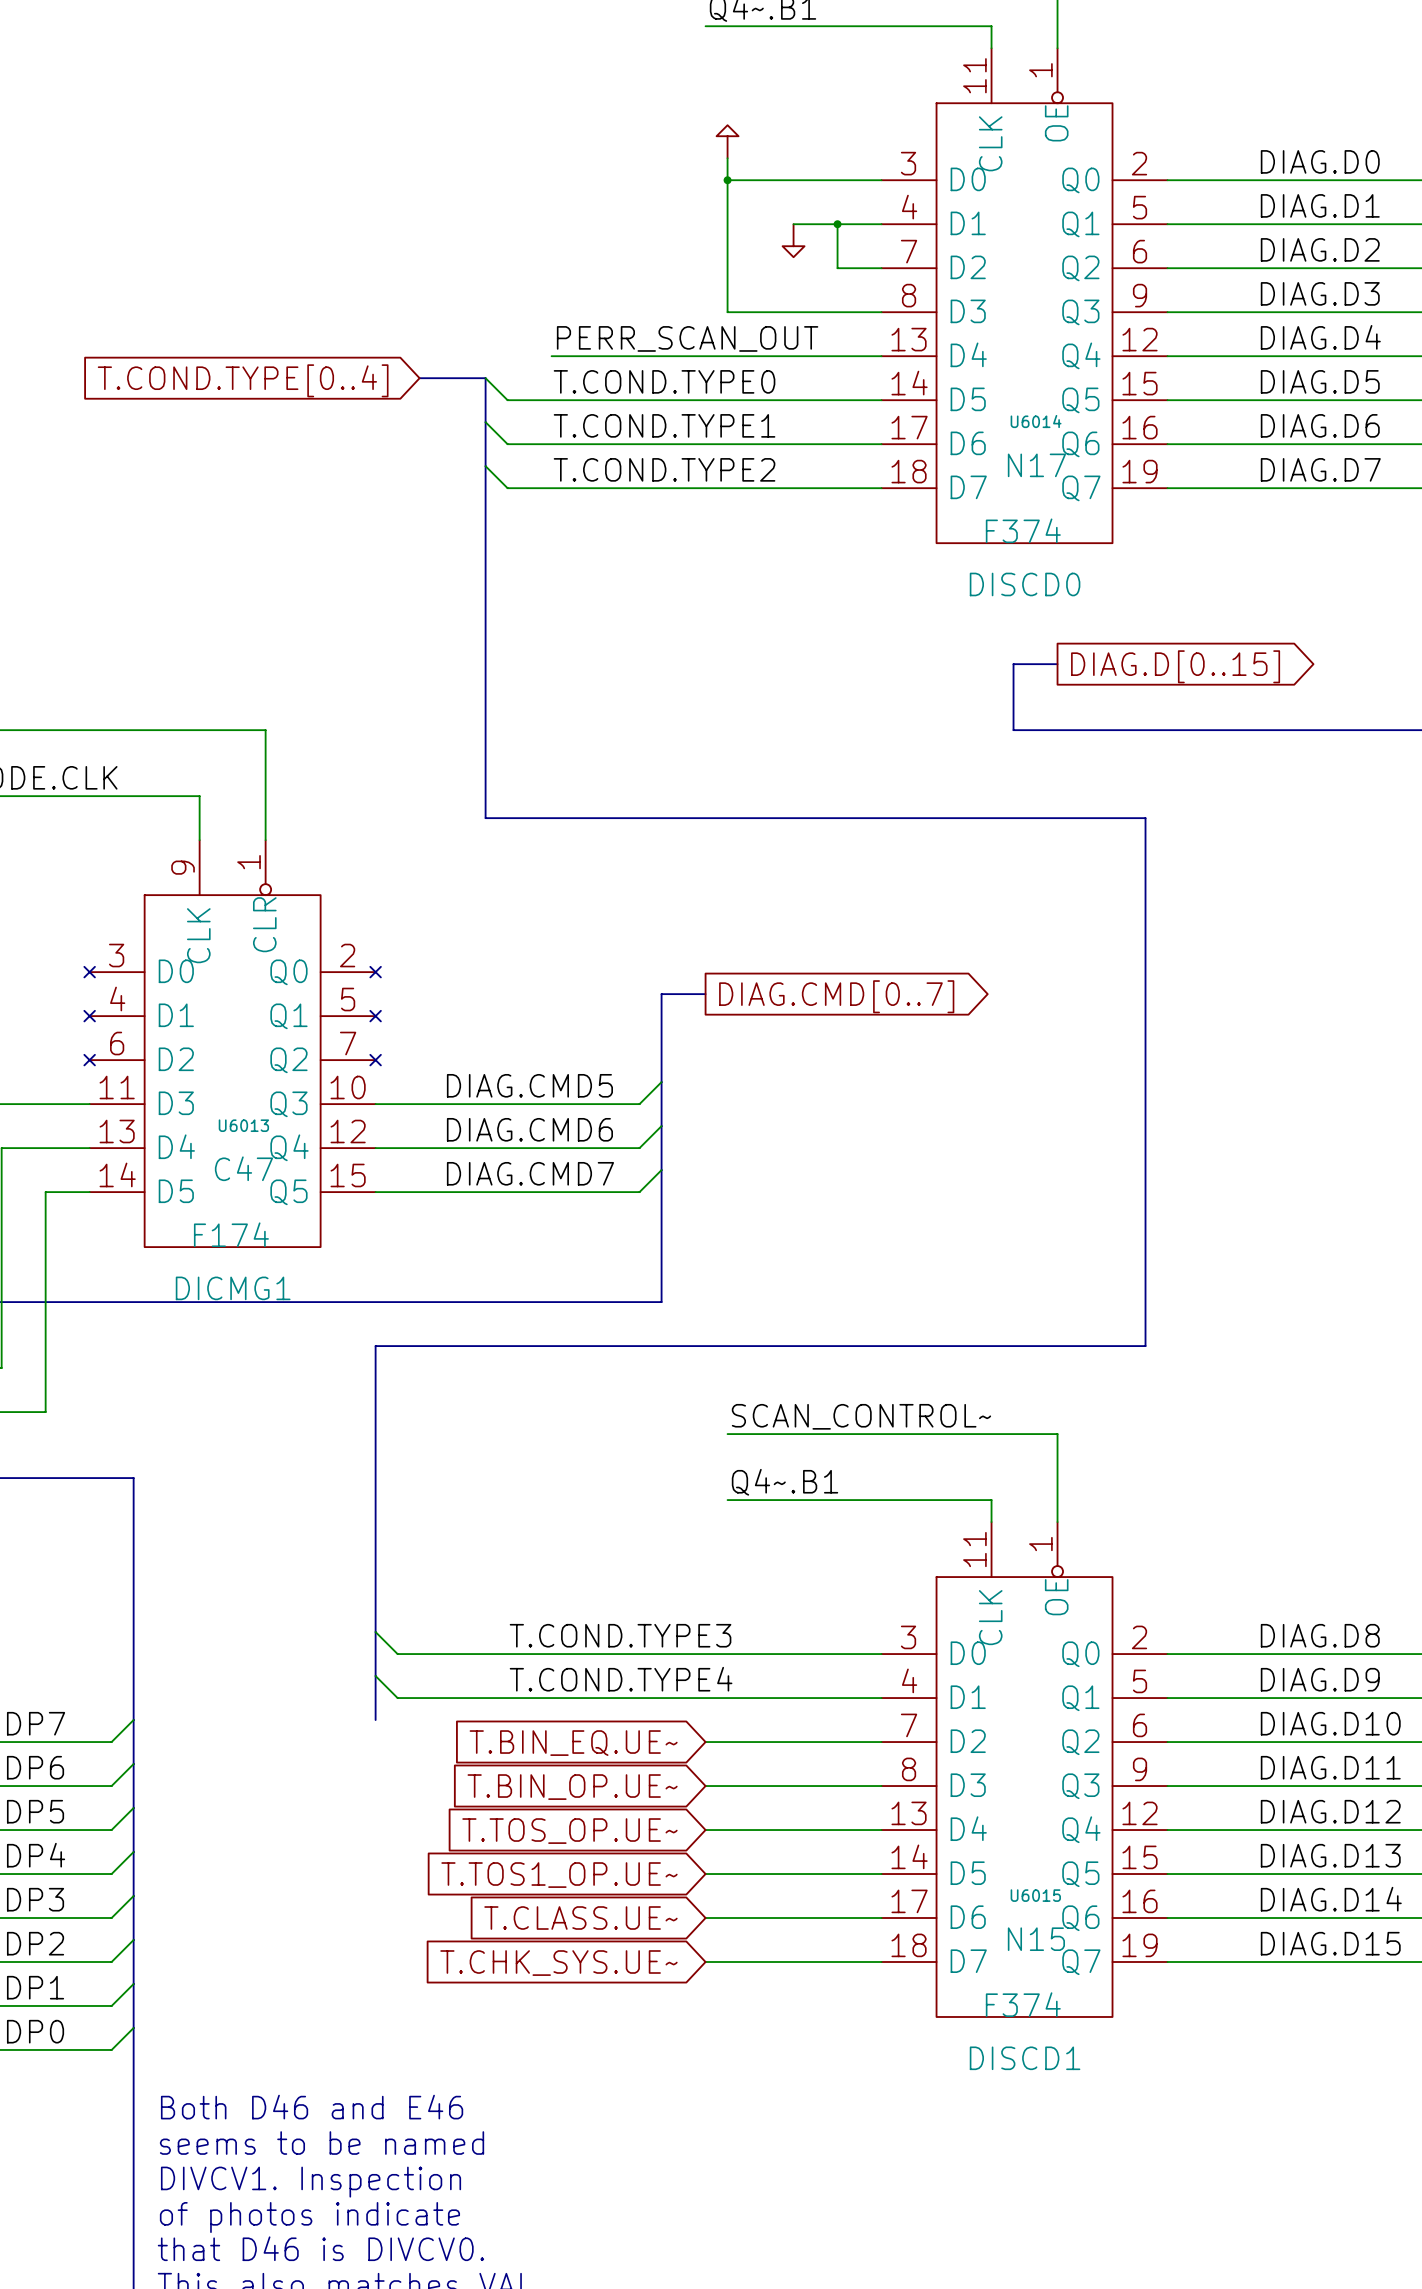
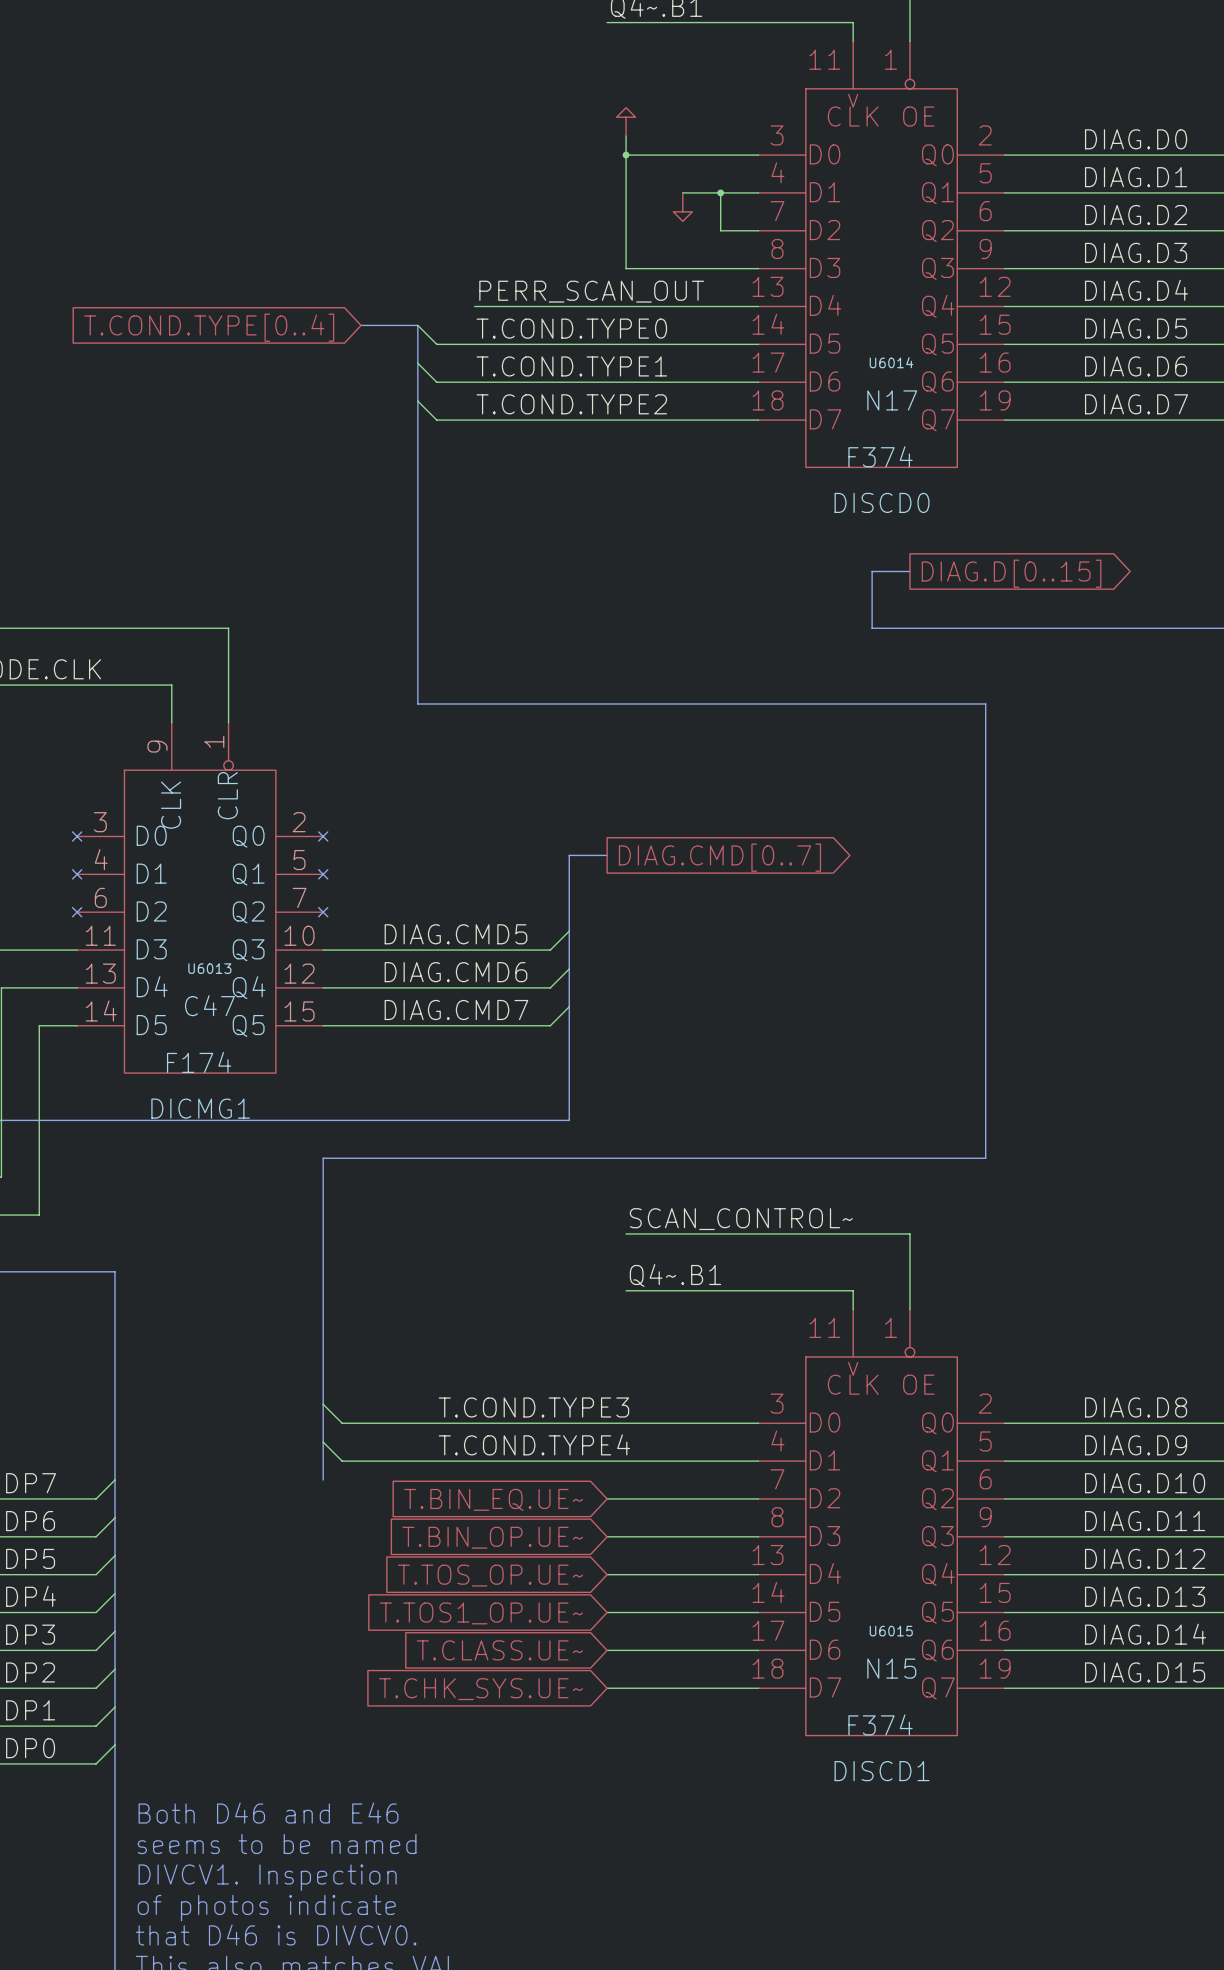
U6014 symbol: [881, 48, 1168, 544] -> [758, 41, 1005, 468]
U6015 symbol: [881, 1522, 1168, 2017] -> [758, 1309, 1005, 1736]

